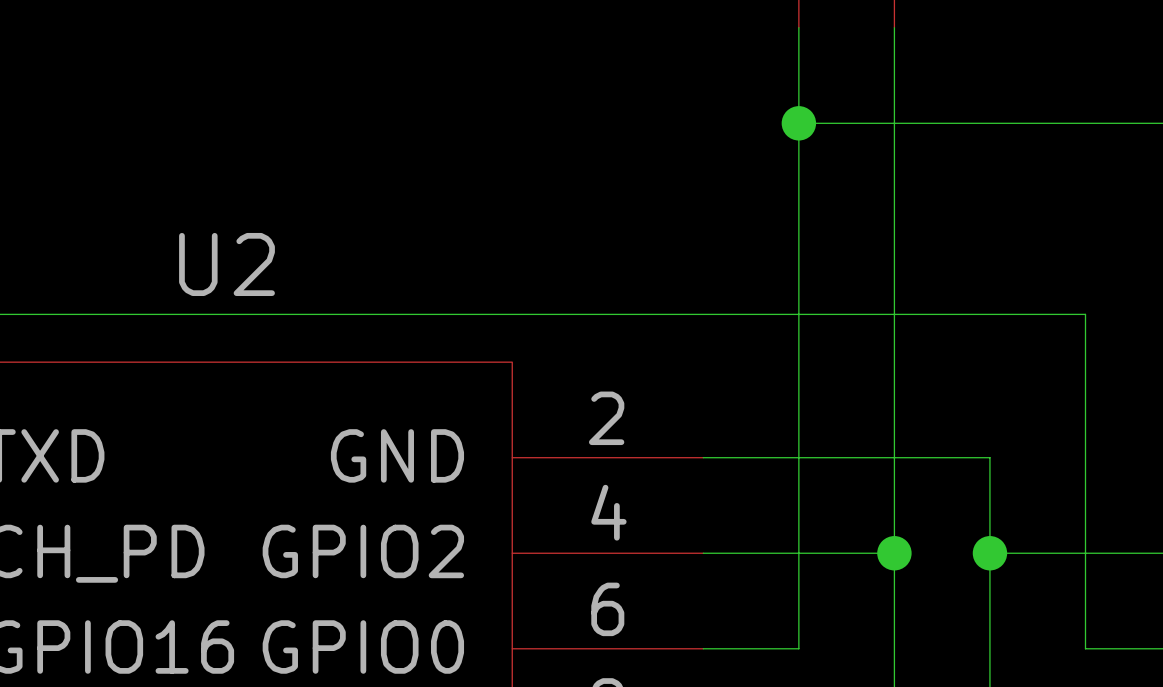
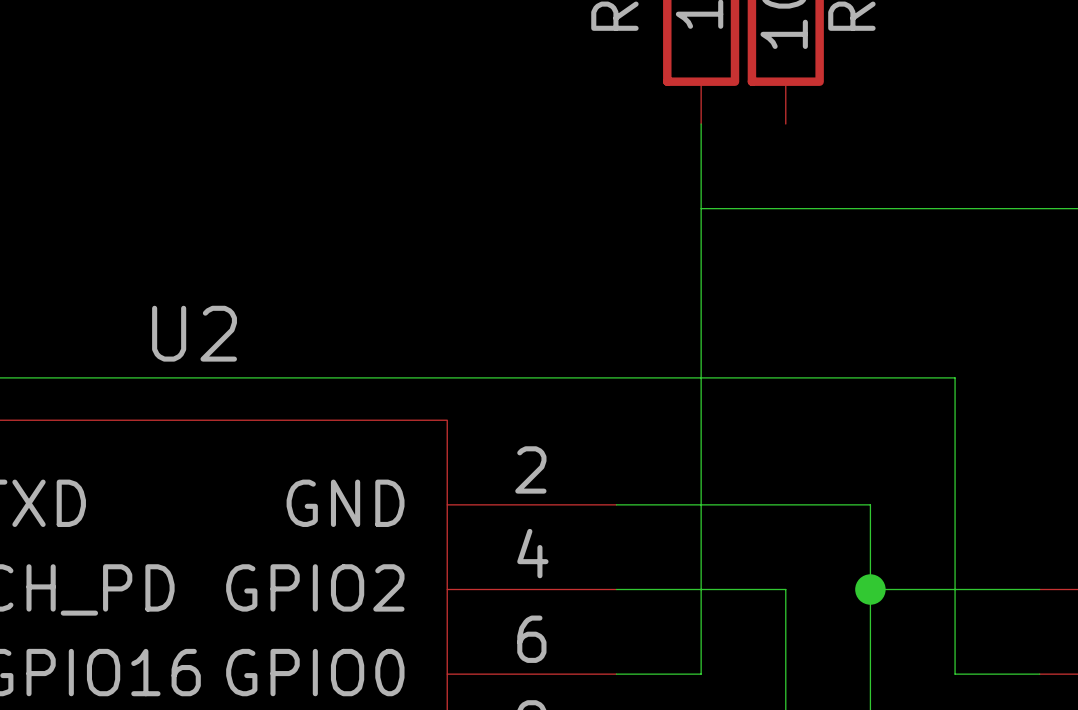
wire: (894, 27) (894, 553) -> none
junction: (798, 123) -> none
junction: (894, 553) -> none

